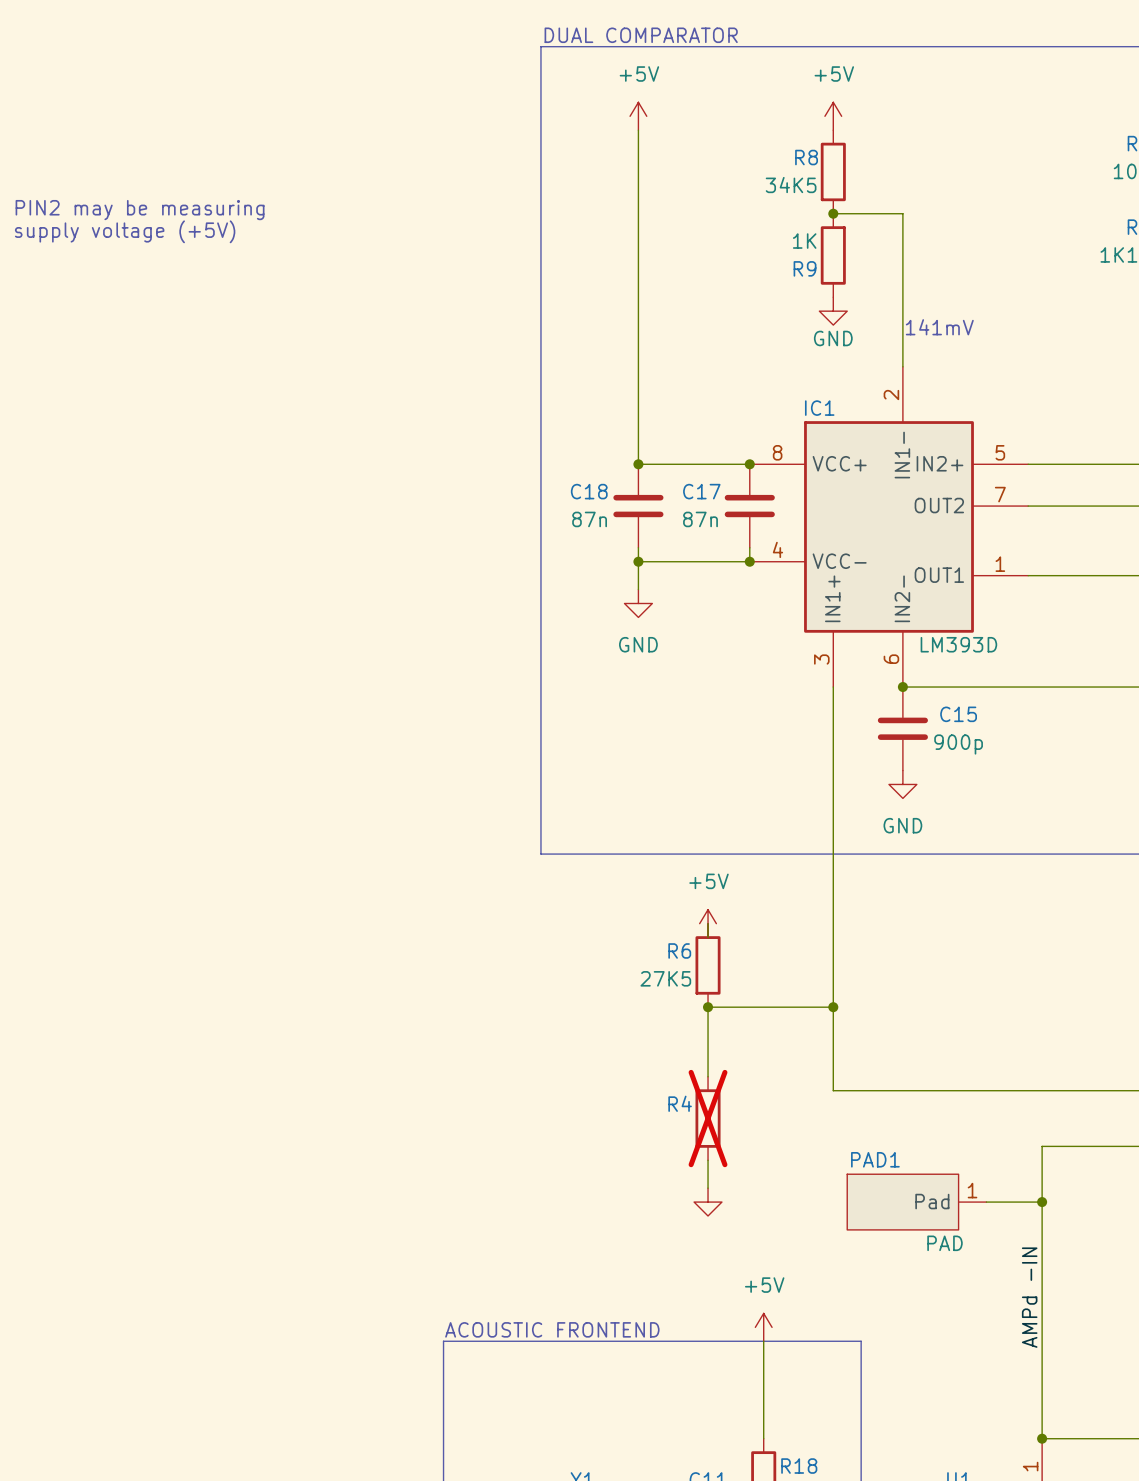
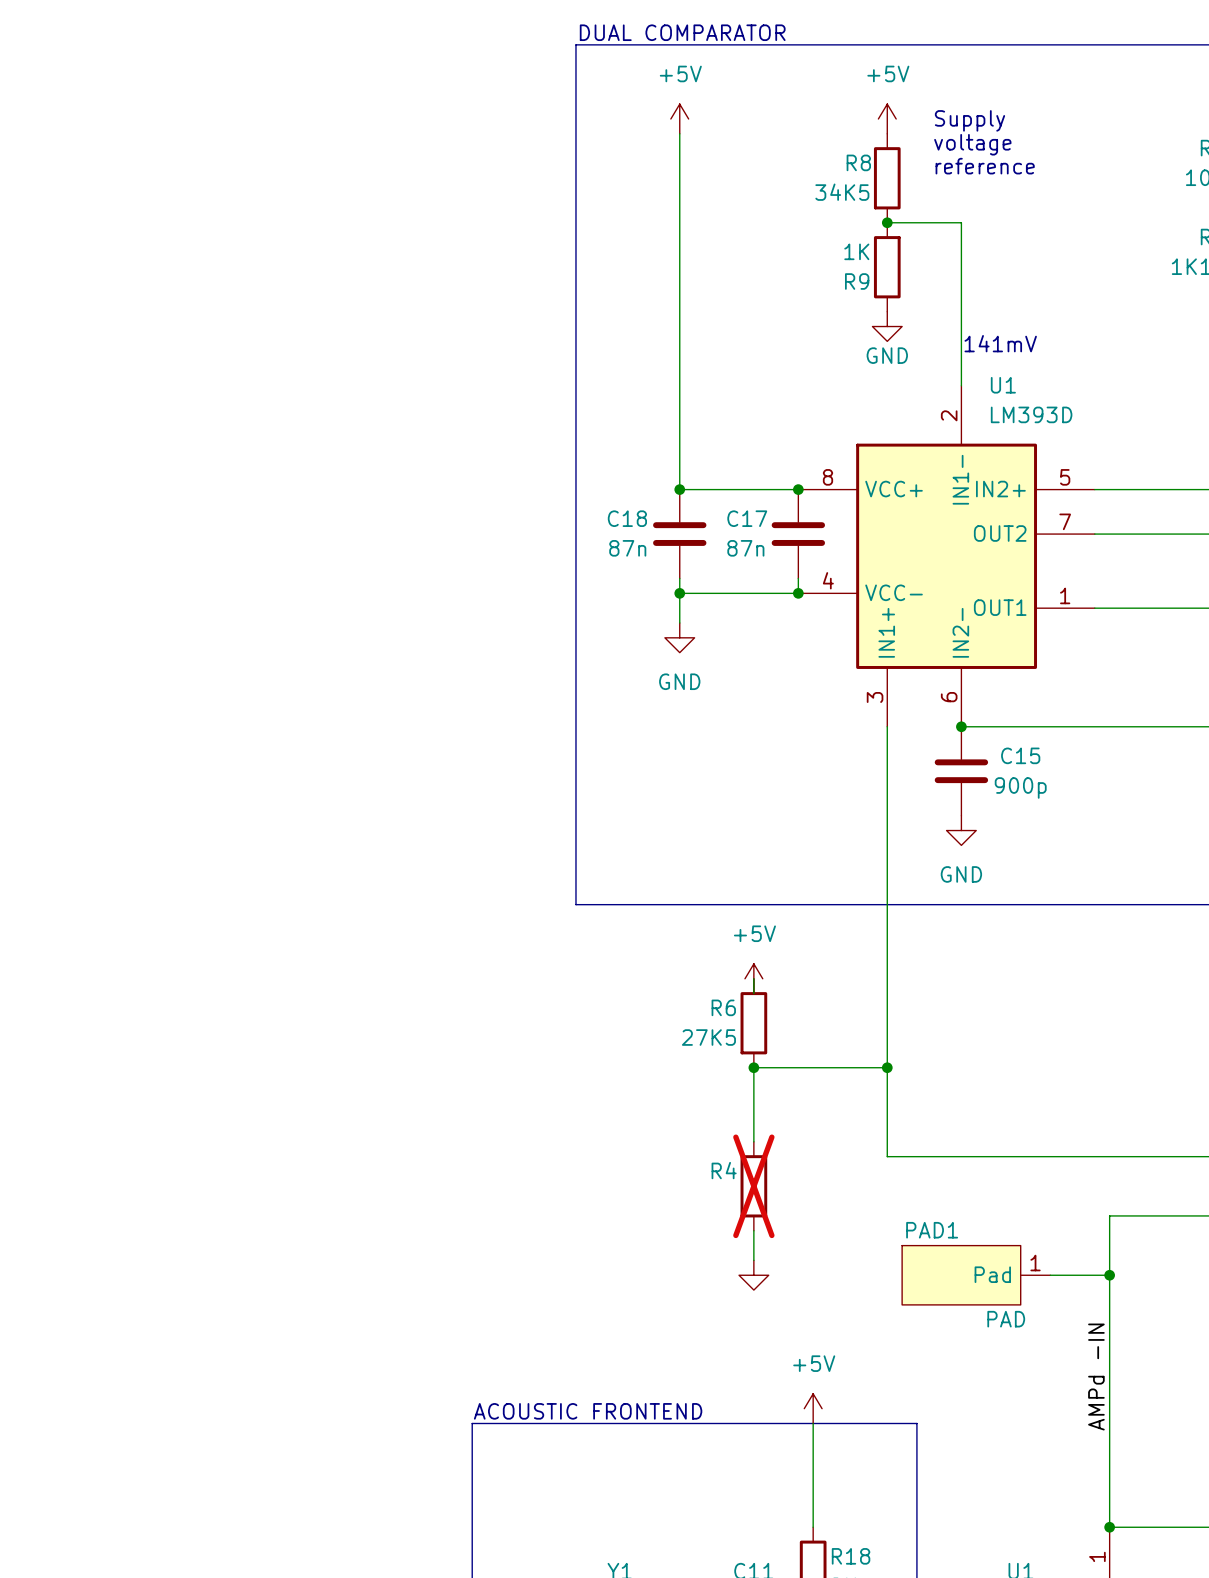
text: none -> Supply (969, 120)
text: none -> voltage (972, 144)
text: none -> reference (985, 166)
text: PIN2 may be measuring (140, 210) -> none
text: supply voltage (+5V) (125, 231) -> none
IC1 name: IC1 (819, 408) -> U1 (1003, 385)
IC1 value position: LM393D (958, 644) -> LM393D (1031, 414)

